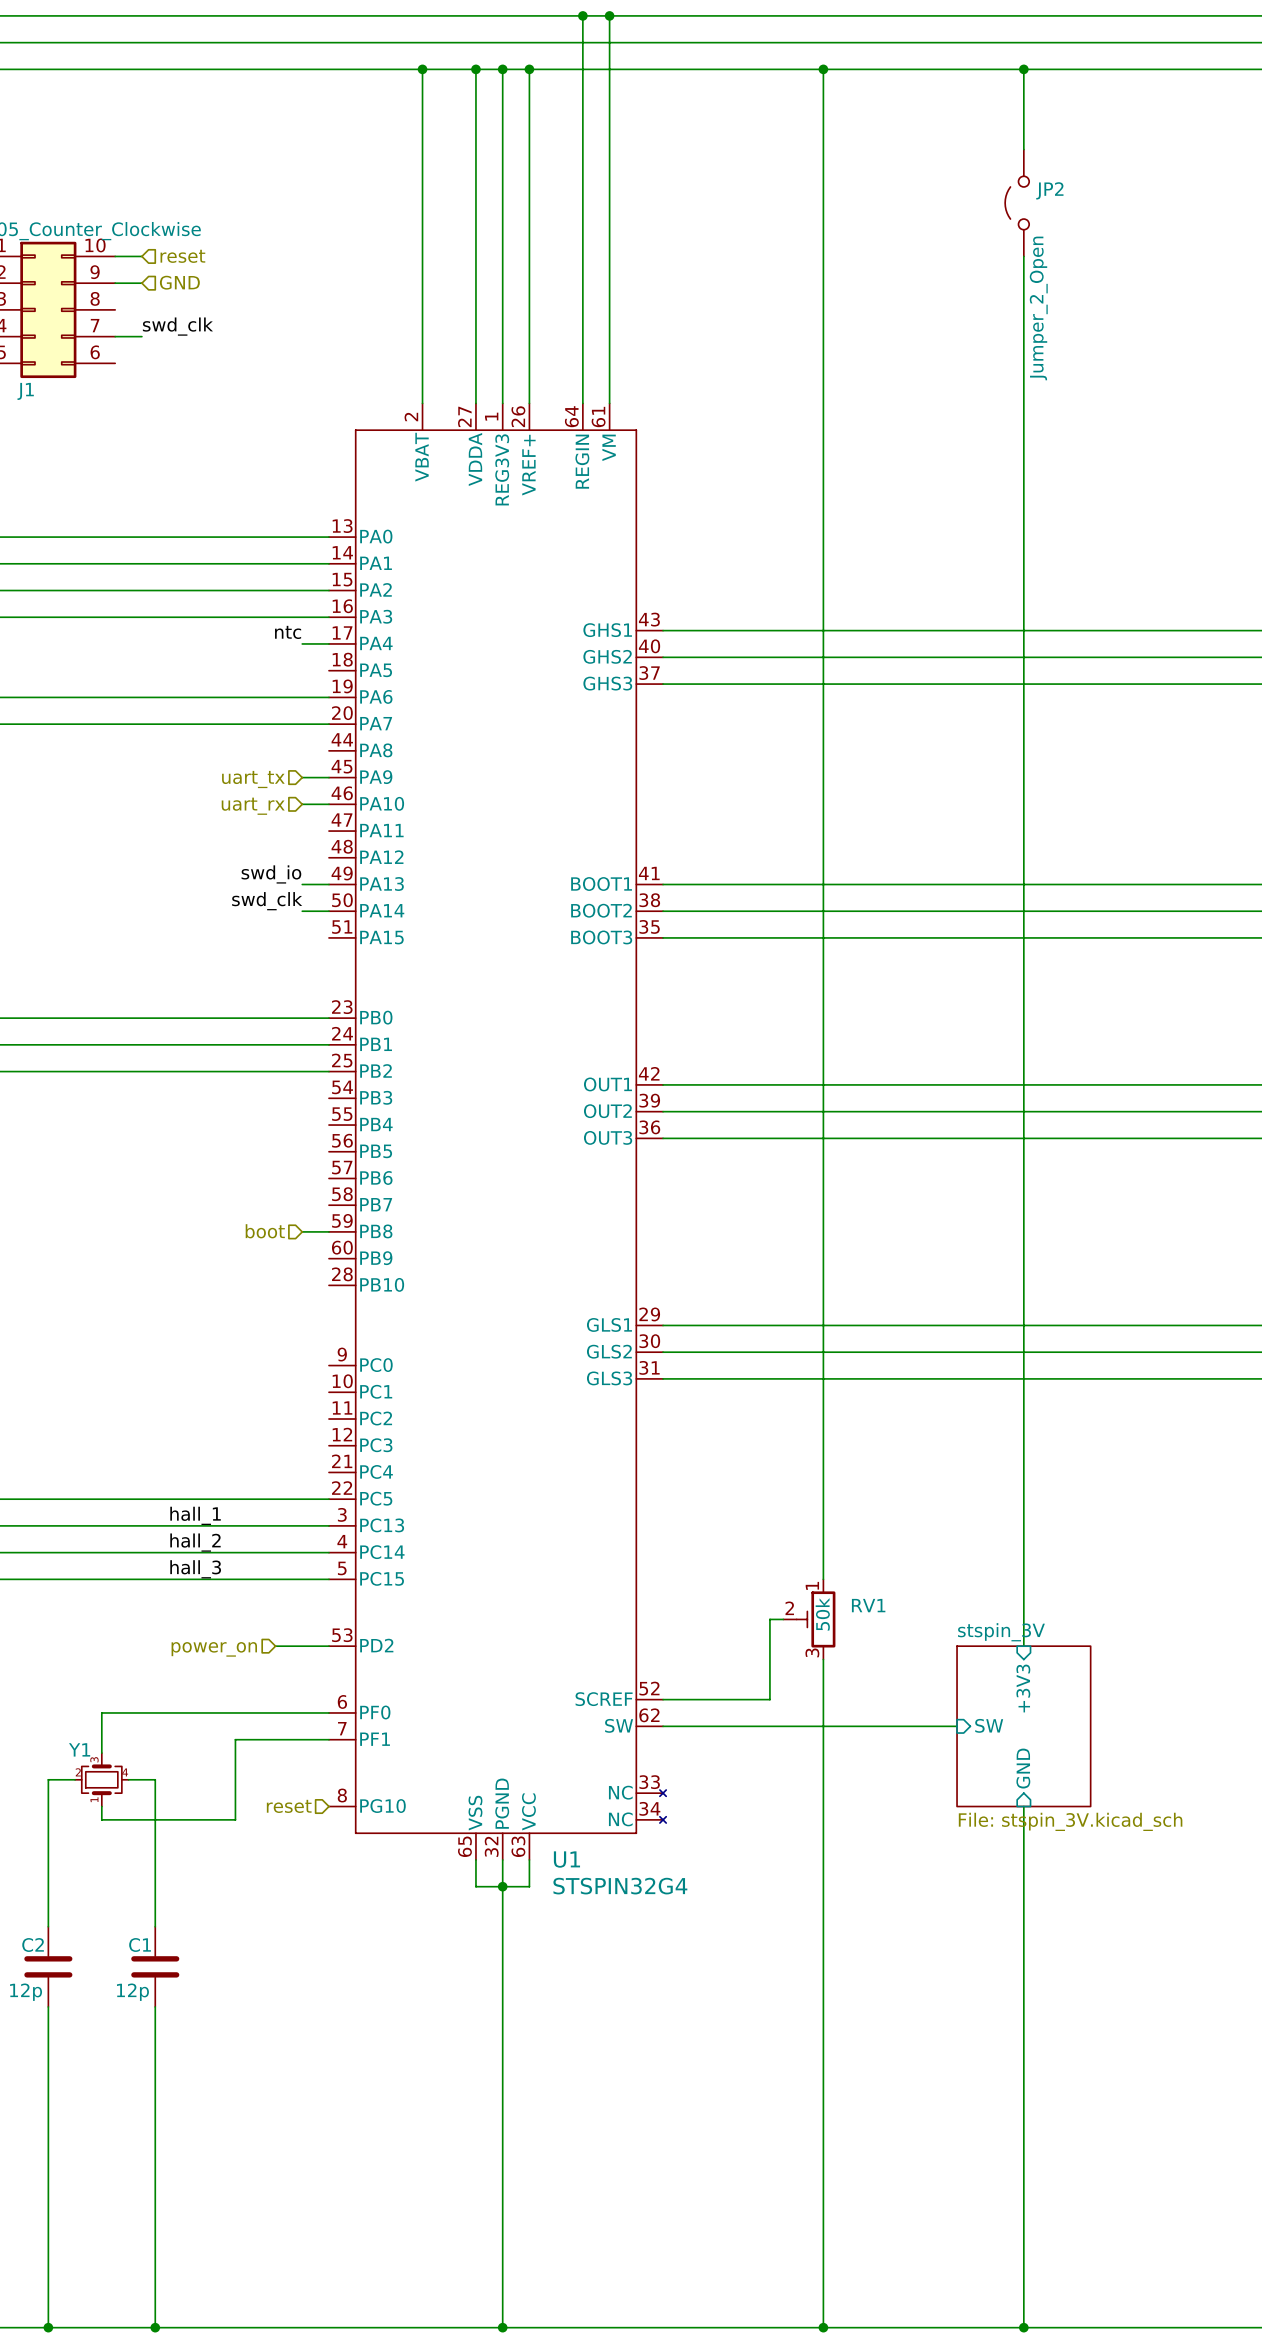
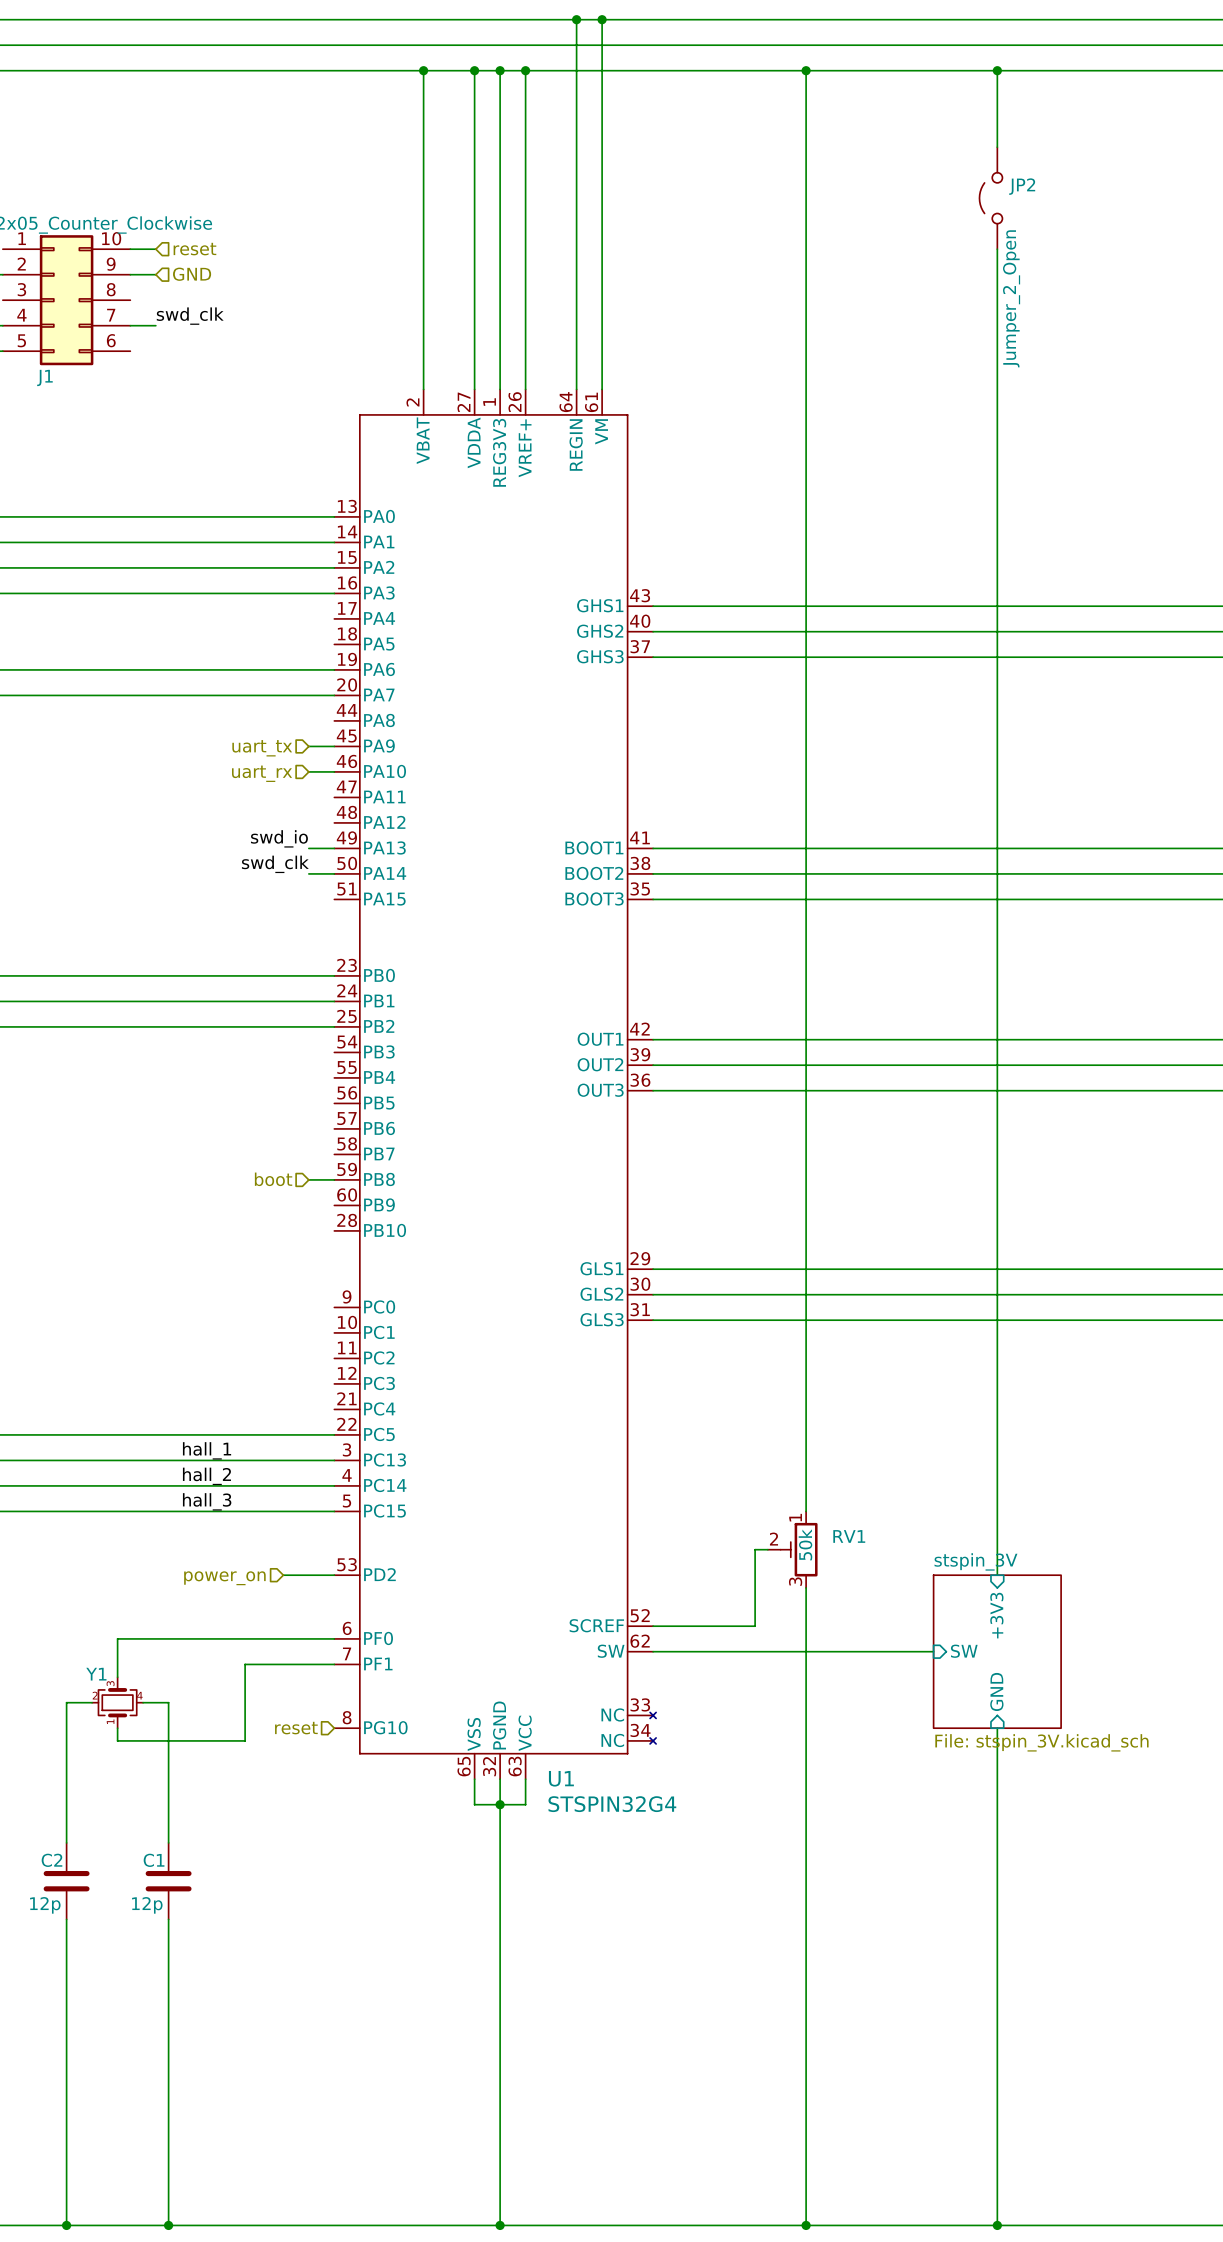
label: ntc (288, 632) -> none
wire: (302, 643) (328, 643) -> none

